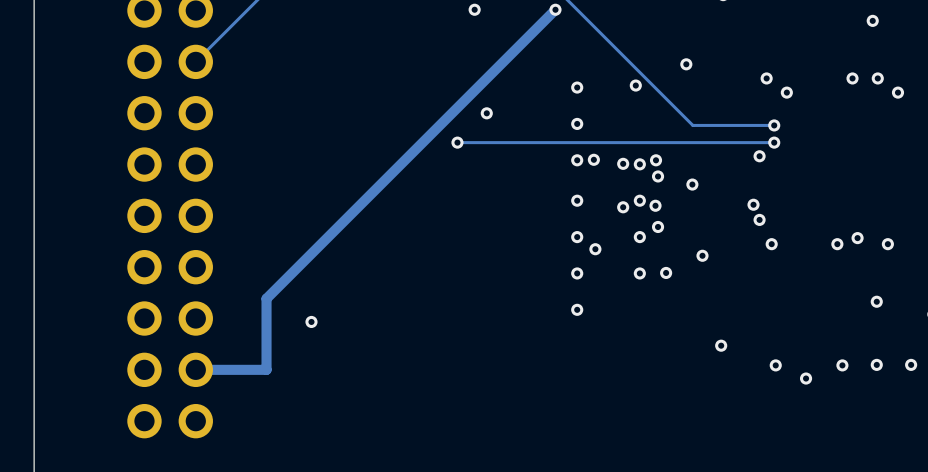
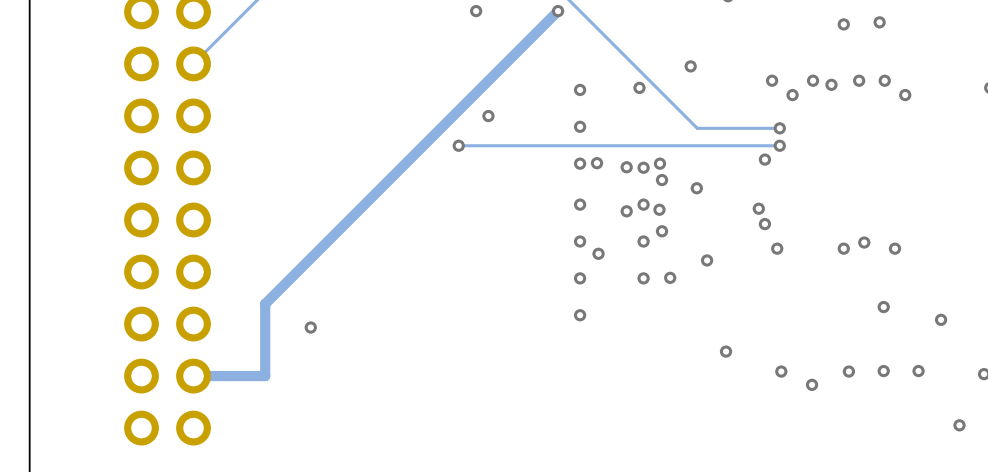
via: none -> (843, 24)
via: none -> (813, 80)
via: none -> (831, 84)

